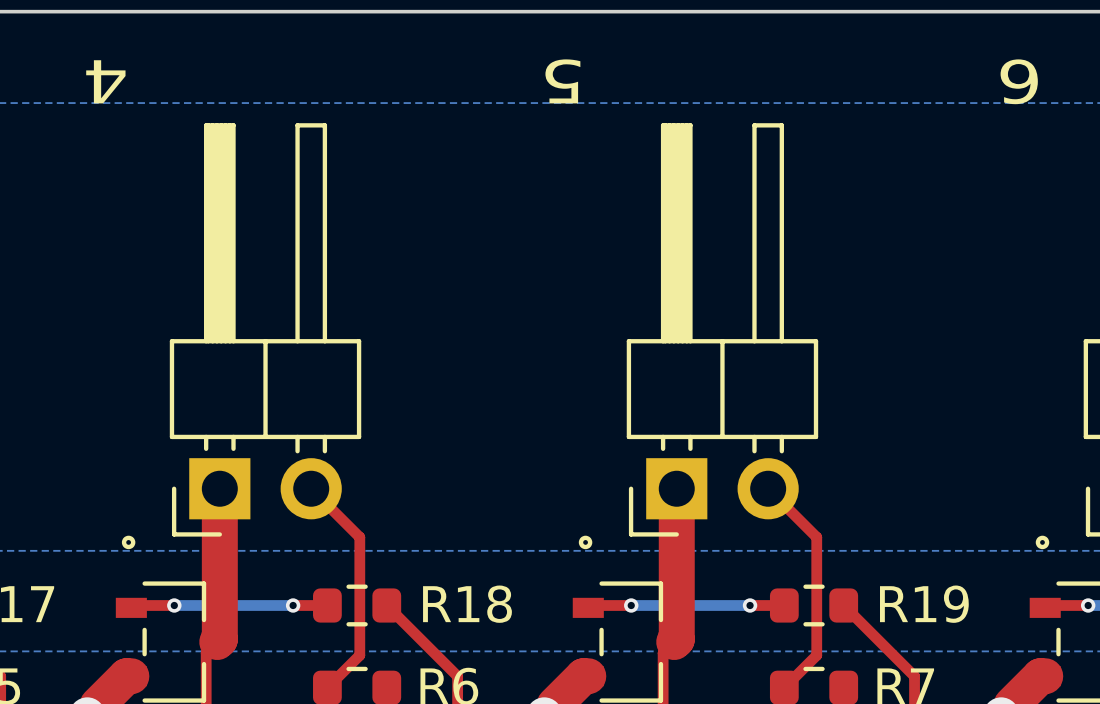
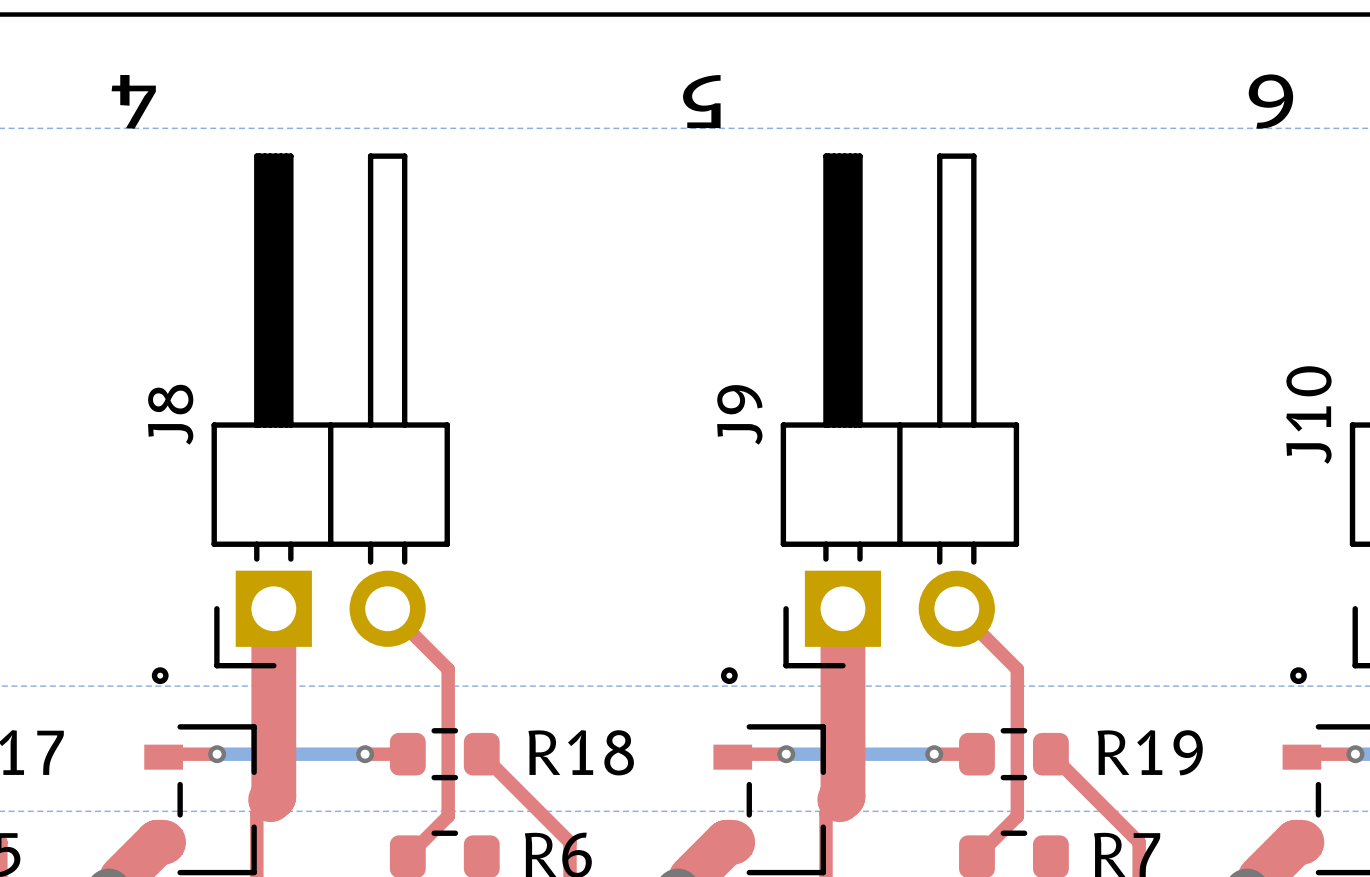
J8 name: none -> J8 (170, 414)
J9 name: none -> J9 (739, 414)
J10 name: none -> J10 (1308, 415)

